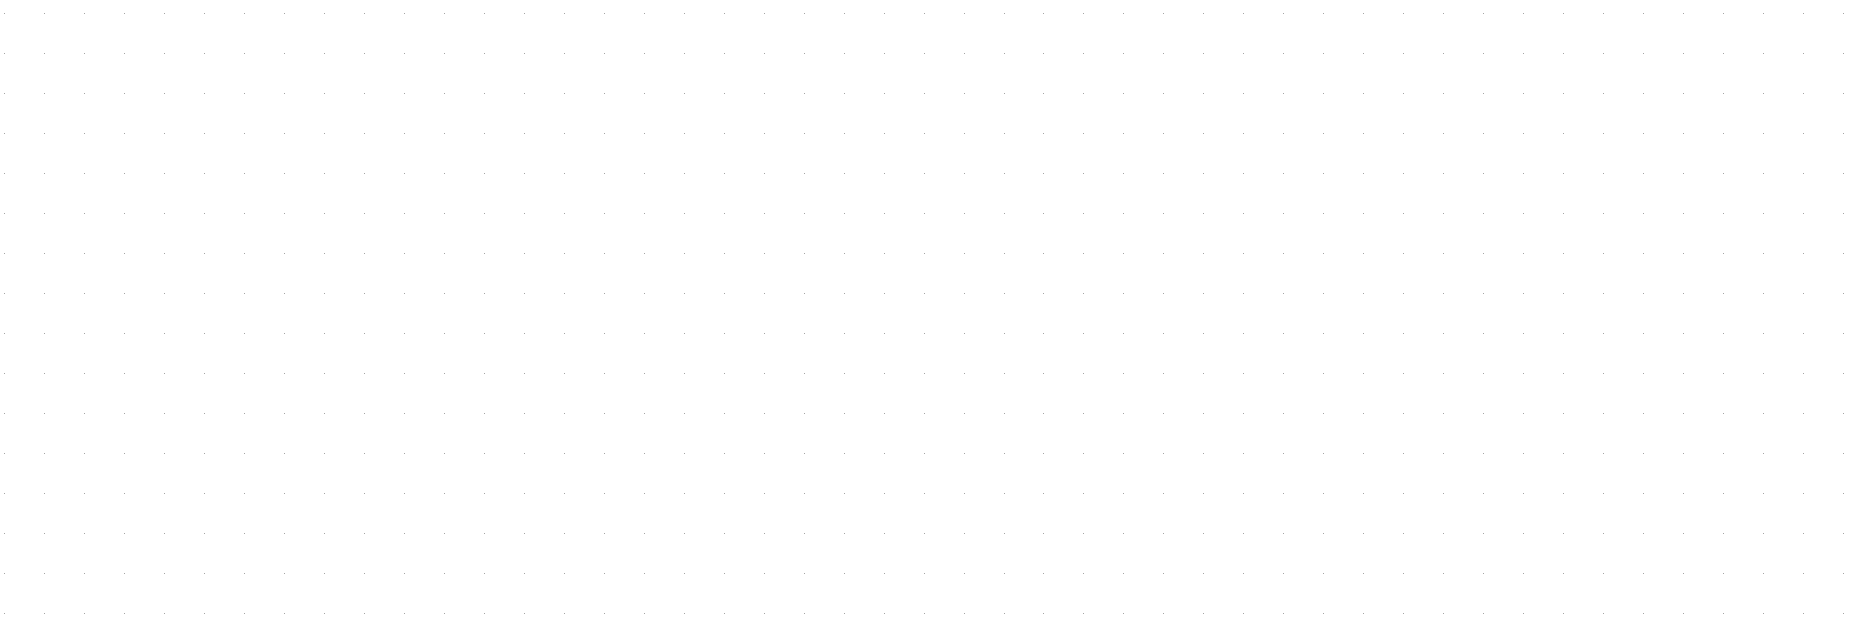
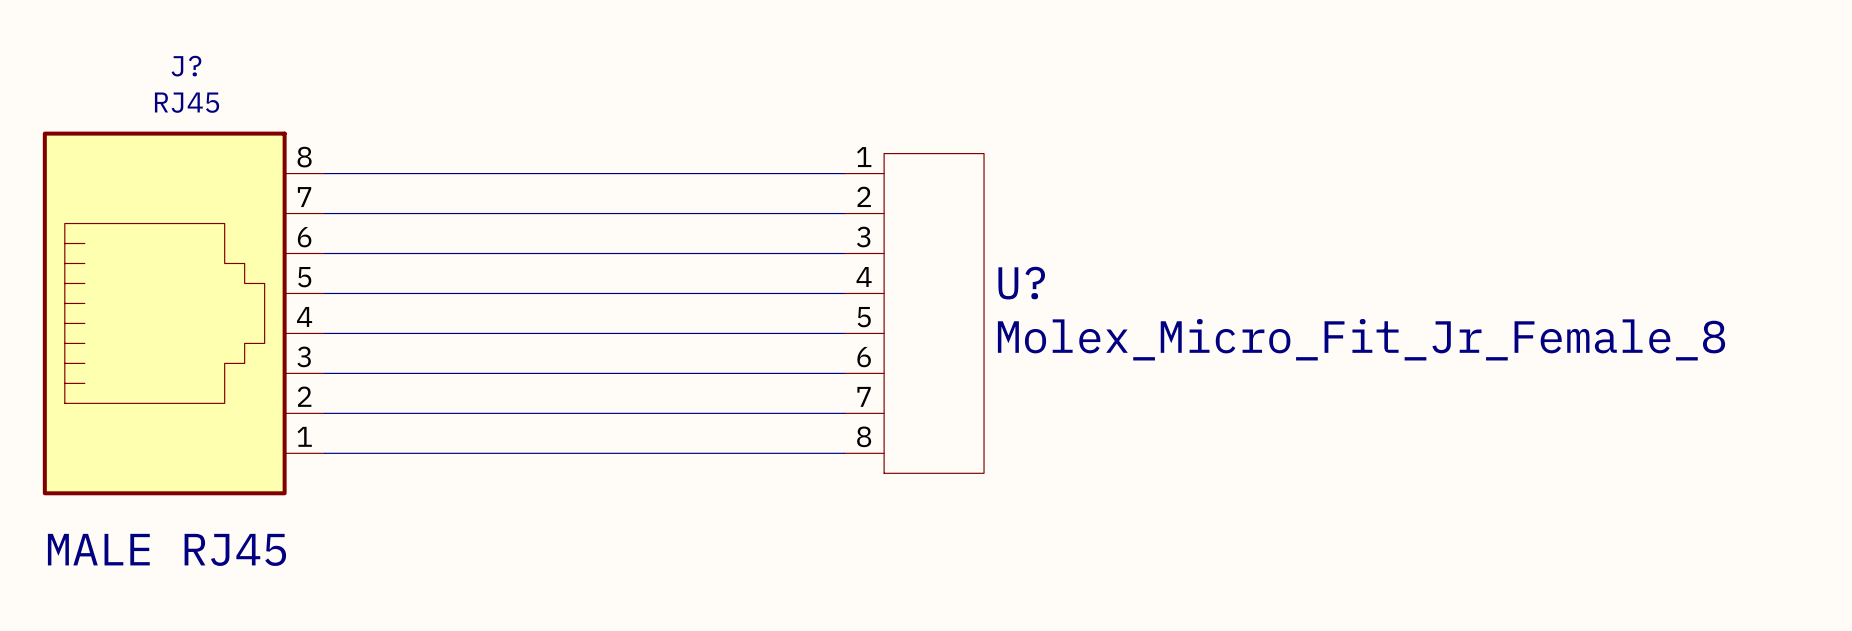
wire: none -> (324, 173) (844, 173)
wire: none -> (324, 213) (844, 213)
wire: none -> (324, 253) (844, 253)
wire: none -> (324, 293) (844, 293)
J?: none -> RJ45 (183, 313)
U?: none -> Molex_Micro_Fit_Jr_Female_8 (914, 313)
wire: none -> (324, 333) (844, 333)
wire: none -> (324, 373) (844, 373)
wire: none -> (324, 413) (844, 413)
wire: none -> (324, 453) (844, 453)
text: none -> MALE RJ45 (166, 549)

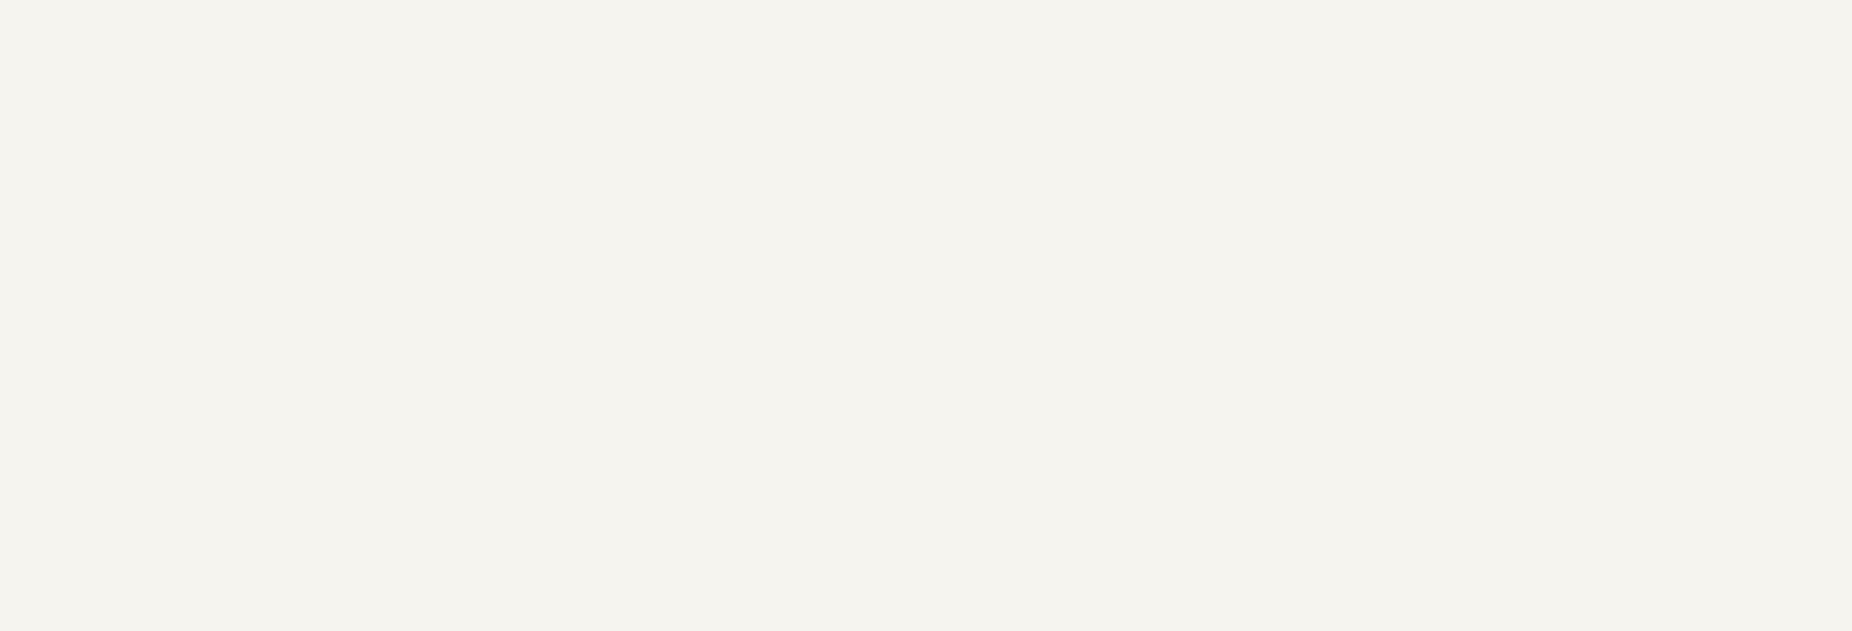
wire: (324, 173) (844, 173) -> none
wire: (324, 213) (844, 213) -> none
wire: (324, 253) (844, 253) -> none
wire: (324, 293) (844, 293) -> none
J?: RJ45 (183, 313) -> none
U?: Molex_Micro_Fit_Jr_Female_8 (914, 313) -> none
wire: (324, 333) (844, 333) -> none
wire: (324, 373) (844, 373) -> none
wire: (324, 413) (844, 413) -> none
wire: (324, 453) (844, 453) -> none
text: MALE RJ45 (166, 549) -> none

